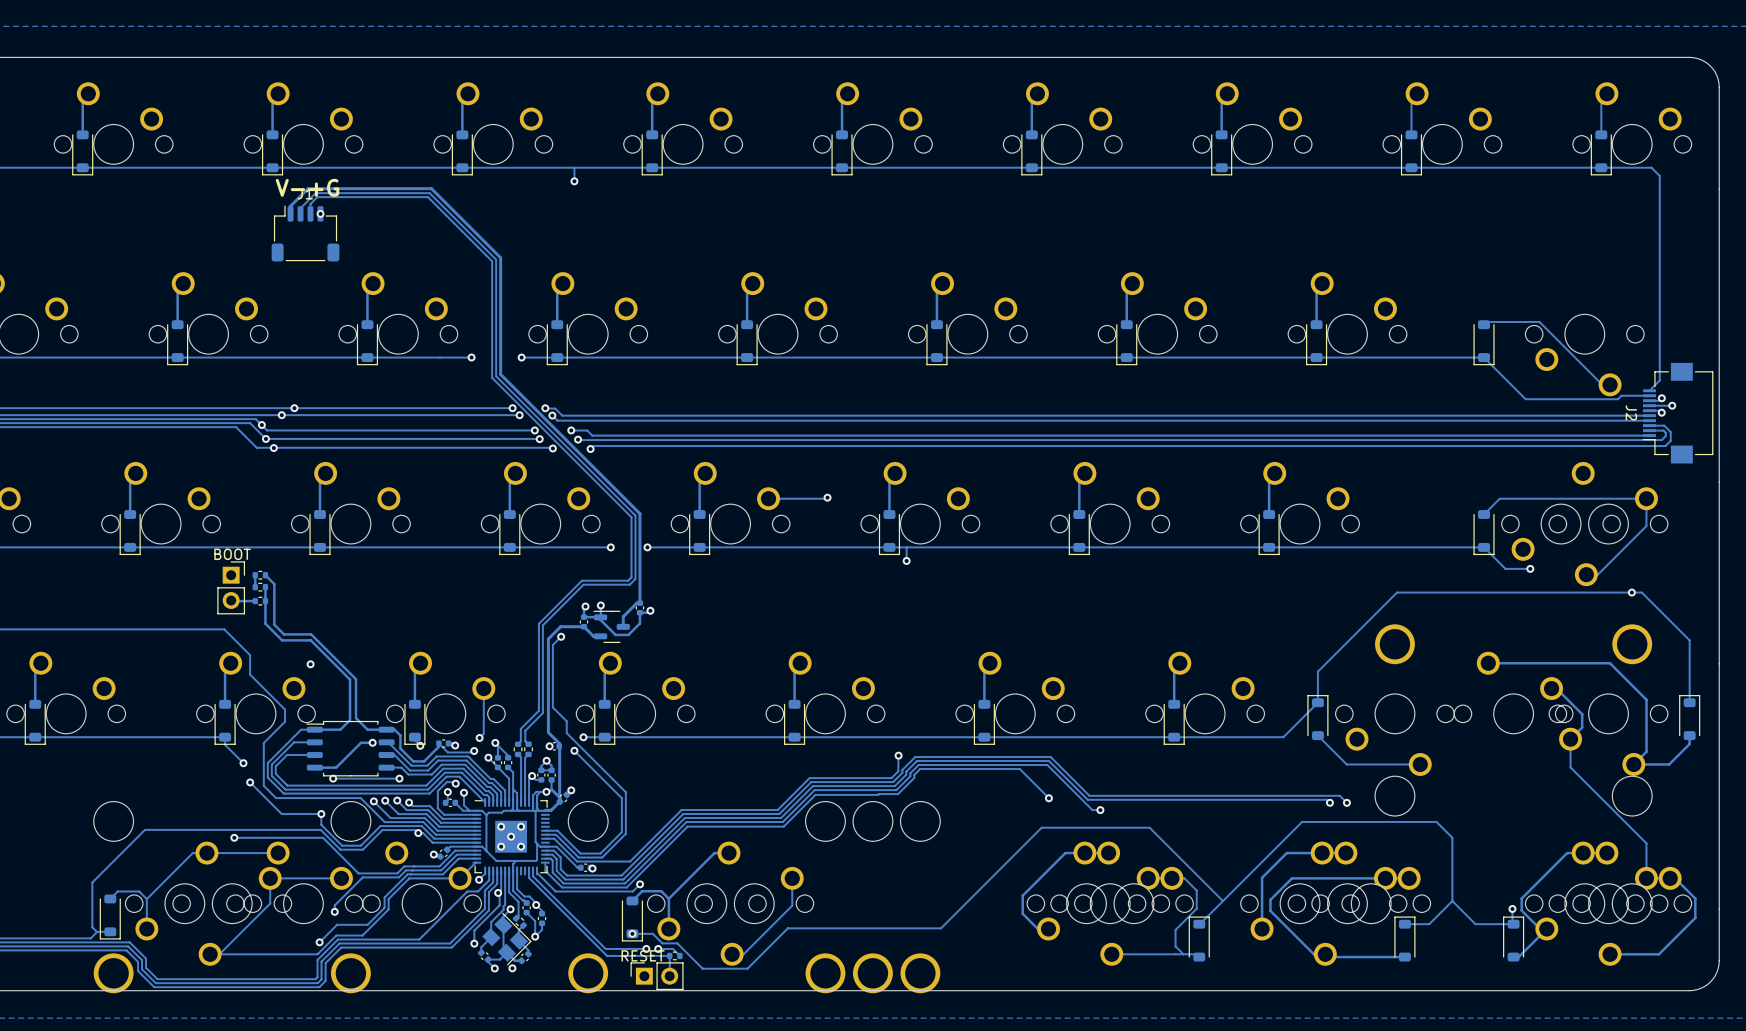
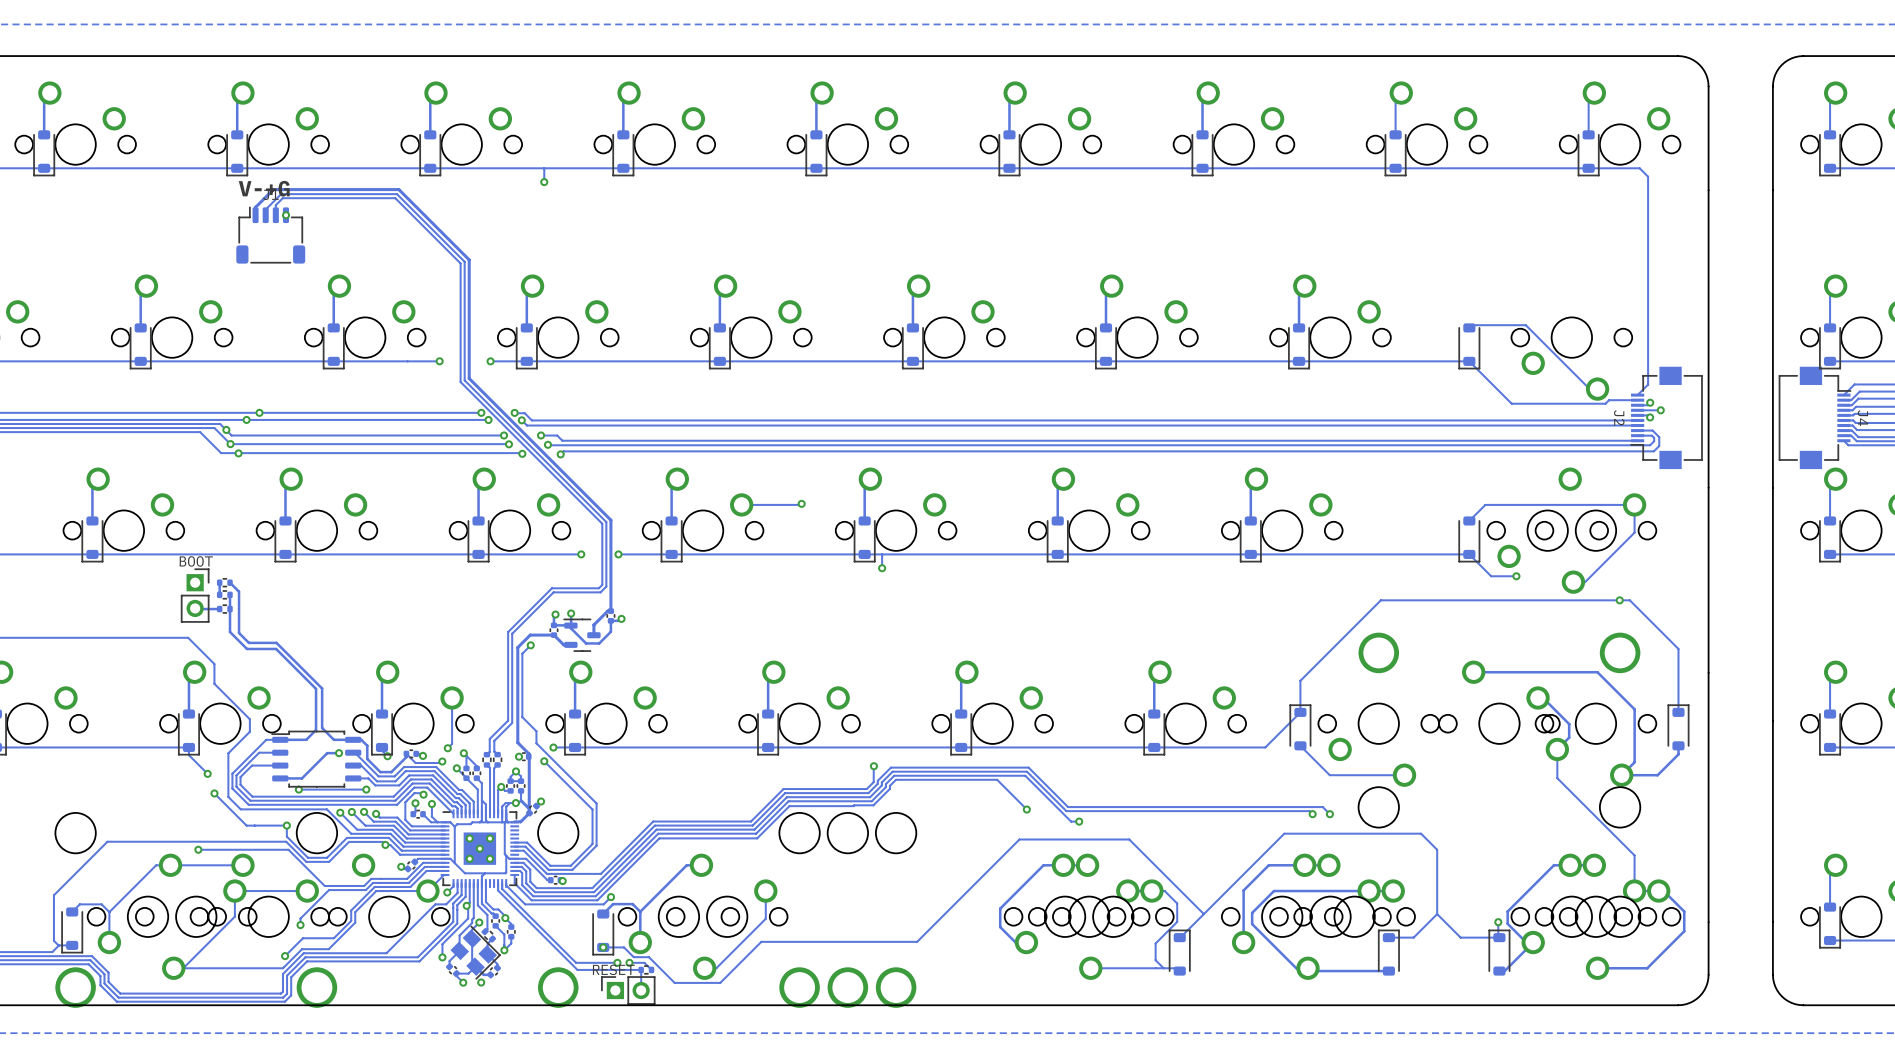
via: (310, 664) -> none

